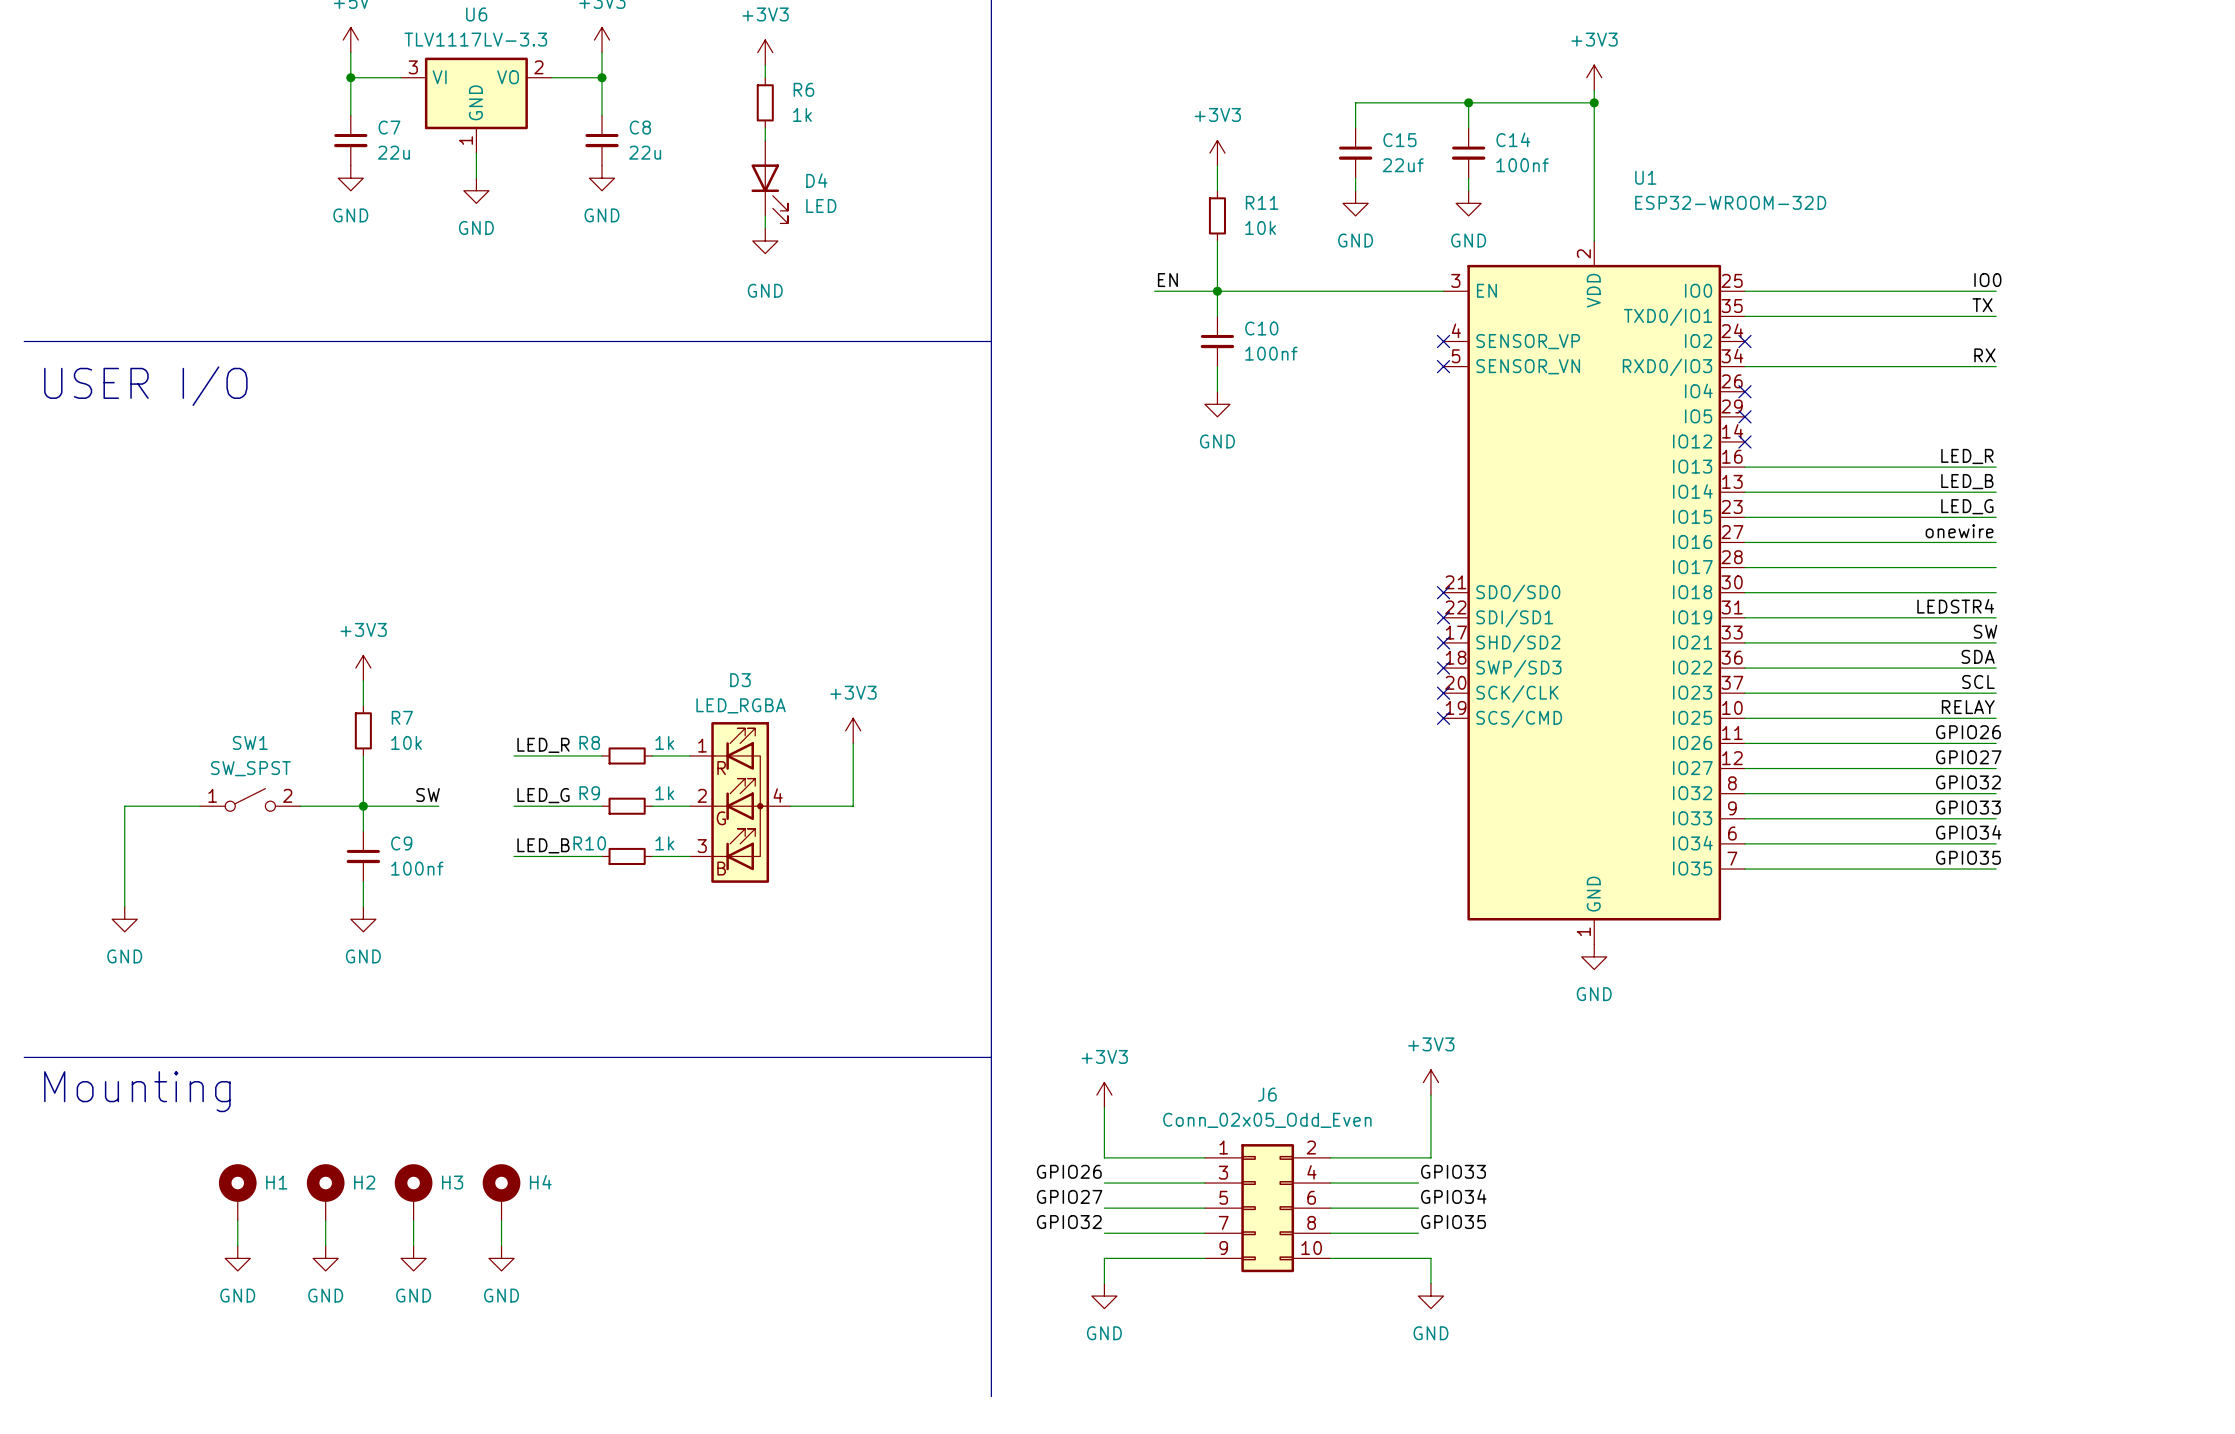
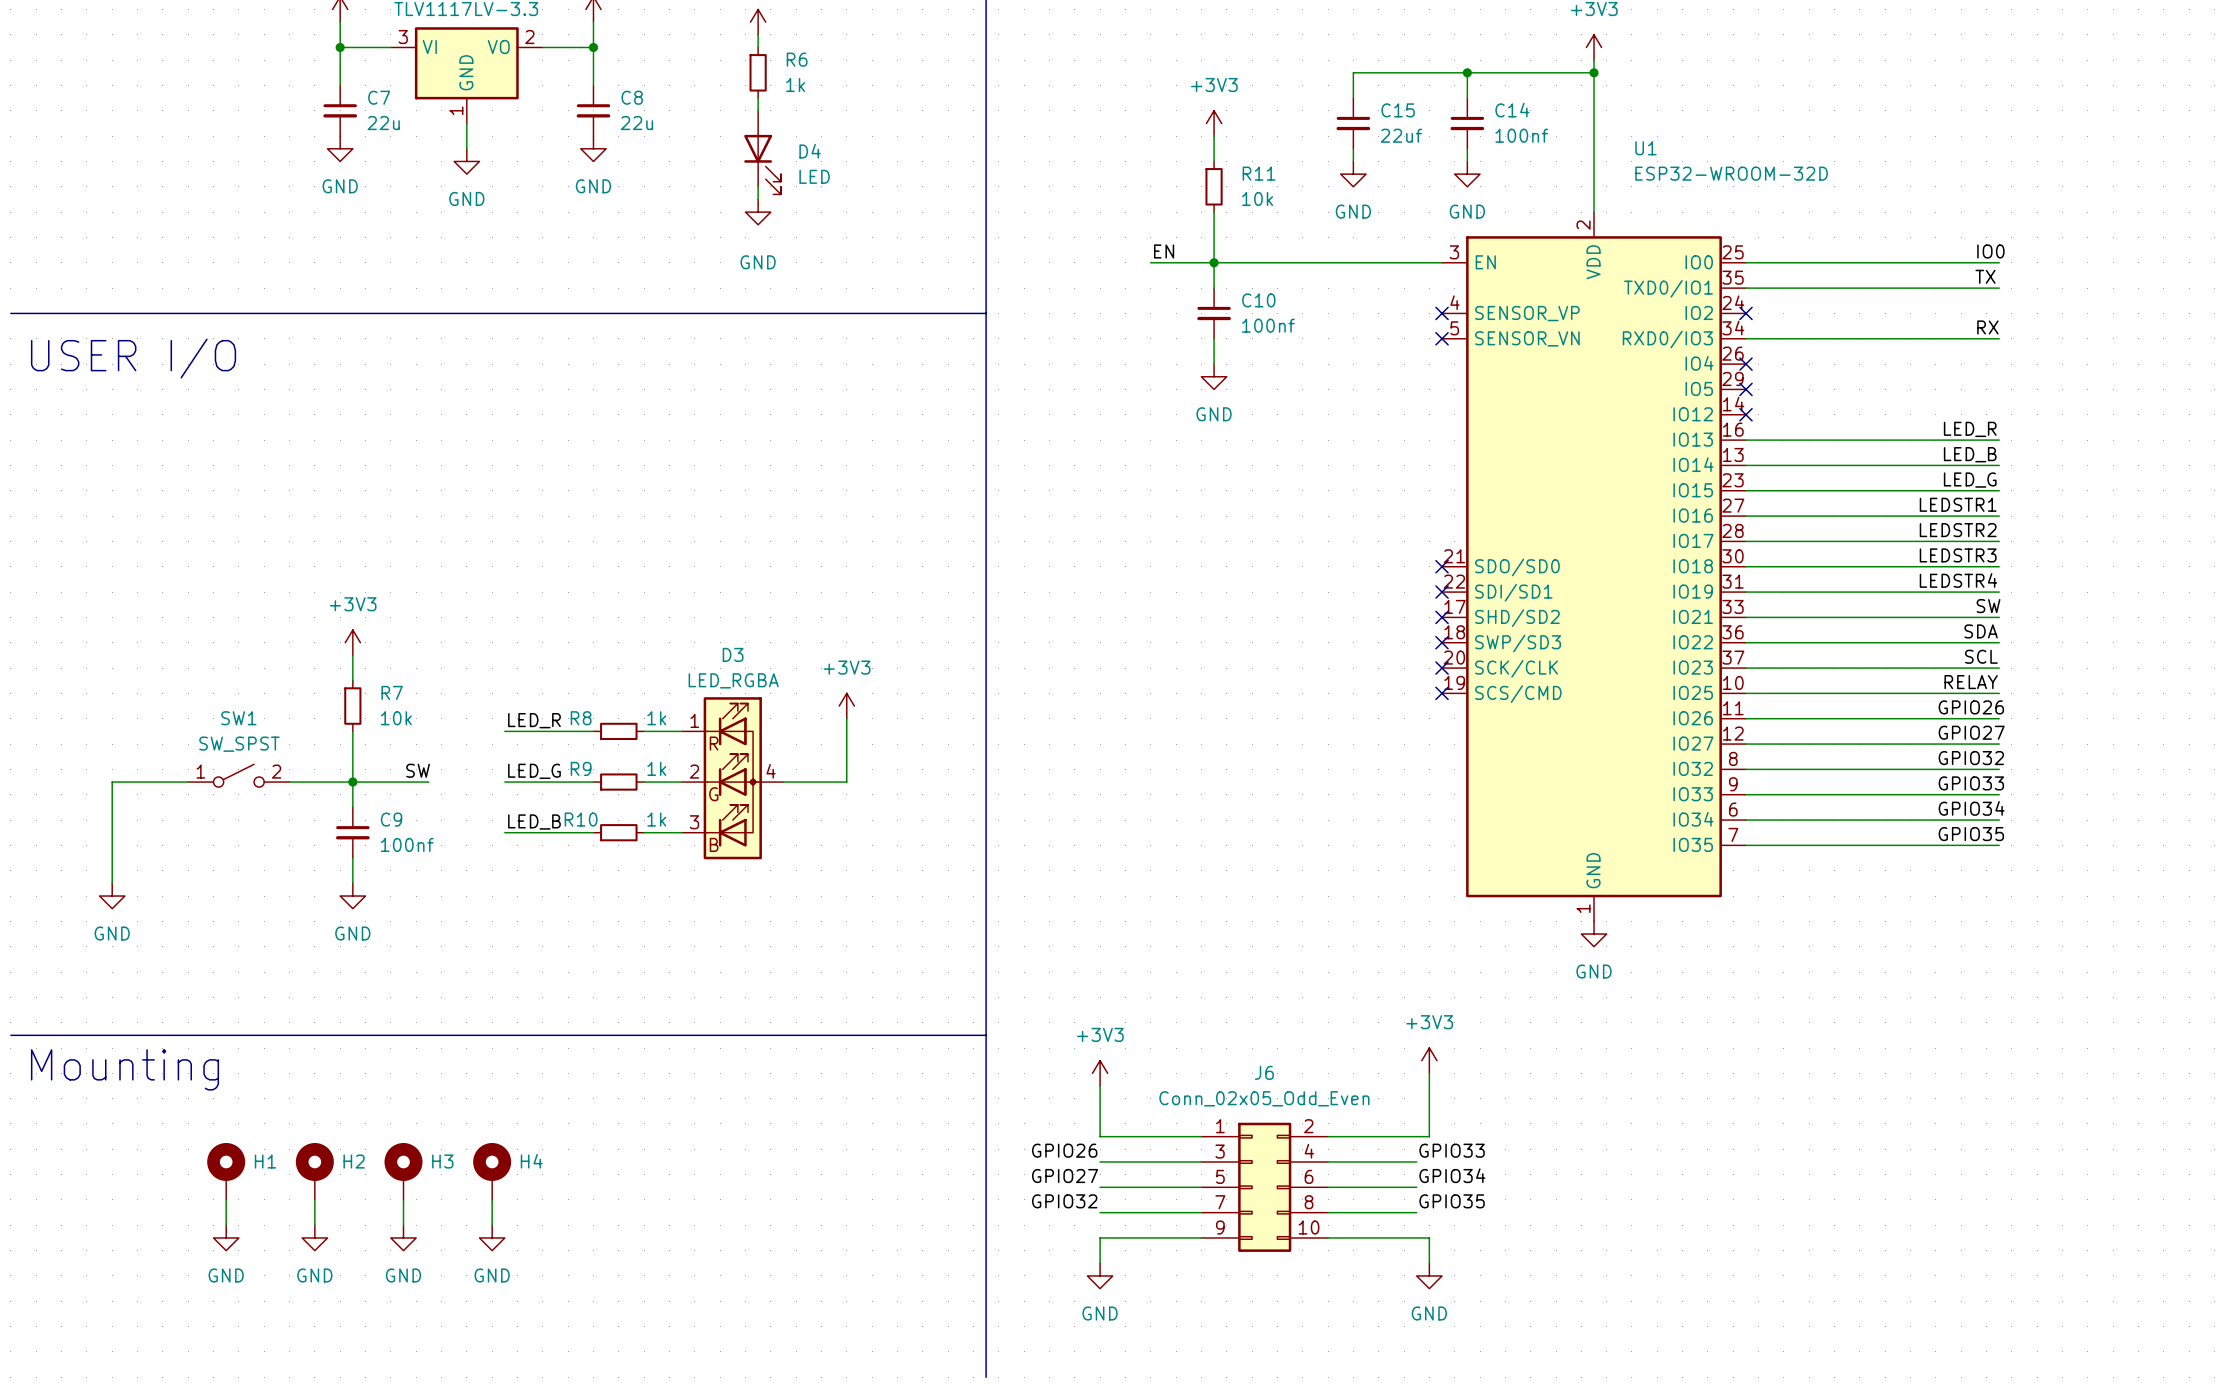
label: onewire (1959, 531) -> LEDSTR1 (1958, 504)
label: none -> LEDSTR2 (1958, 530)
label: none -> LEDSTR3 (1958, 555)

